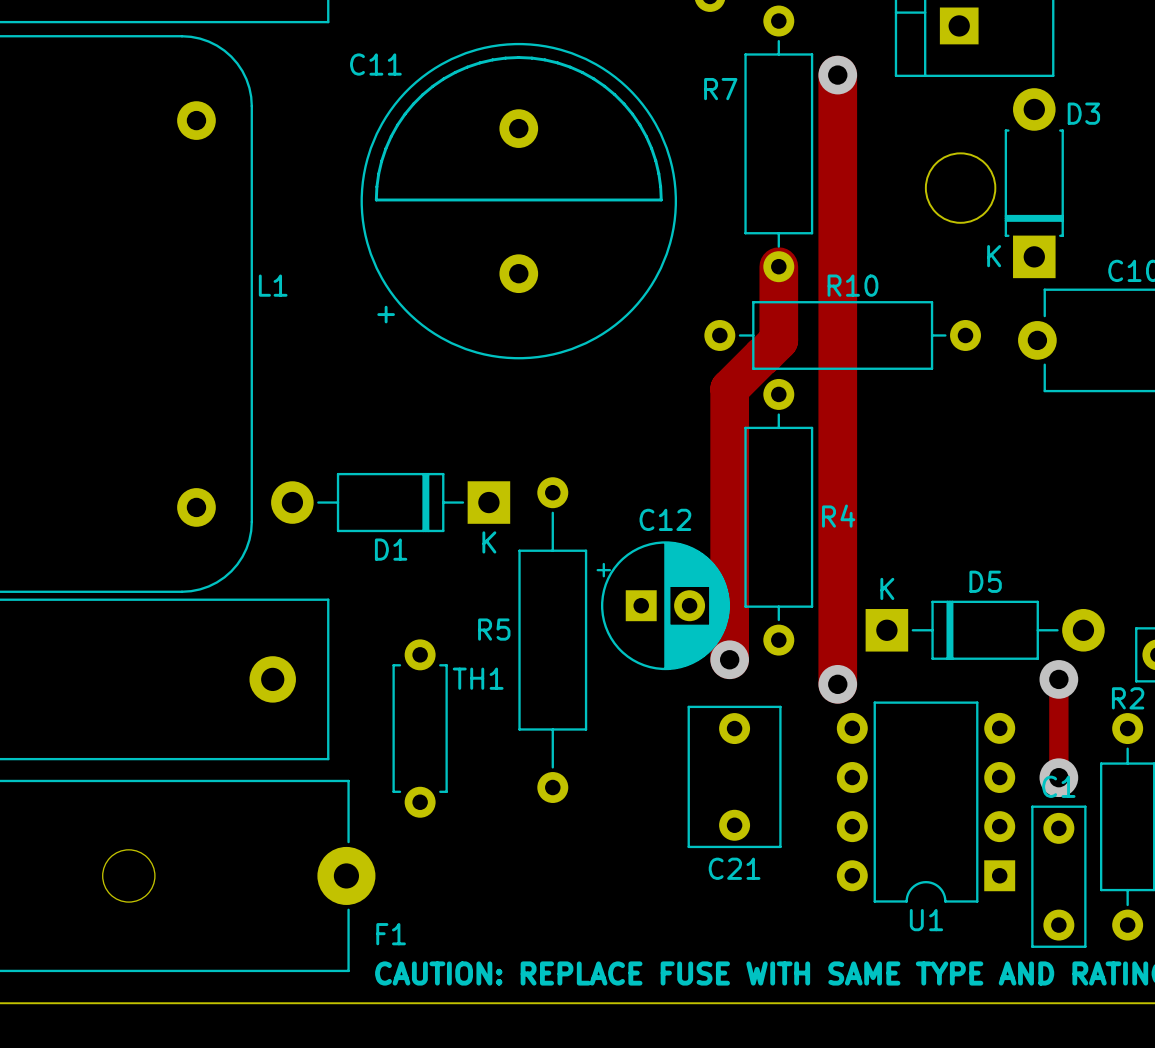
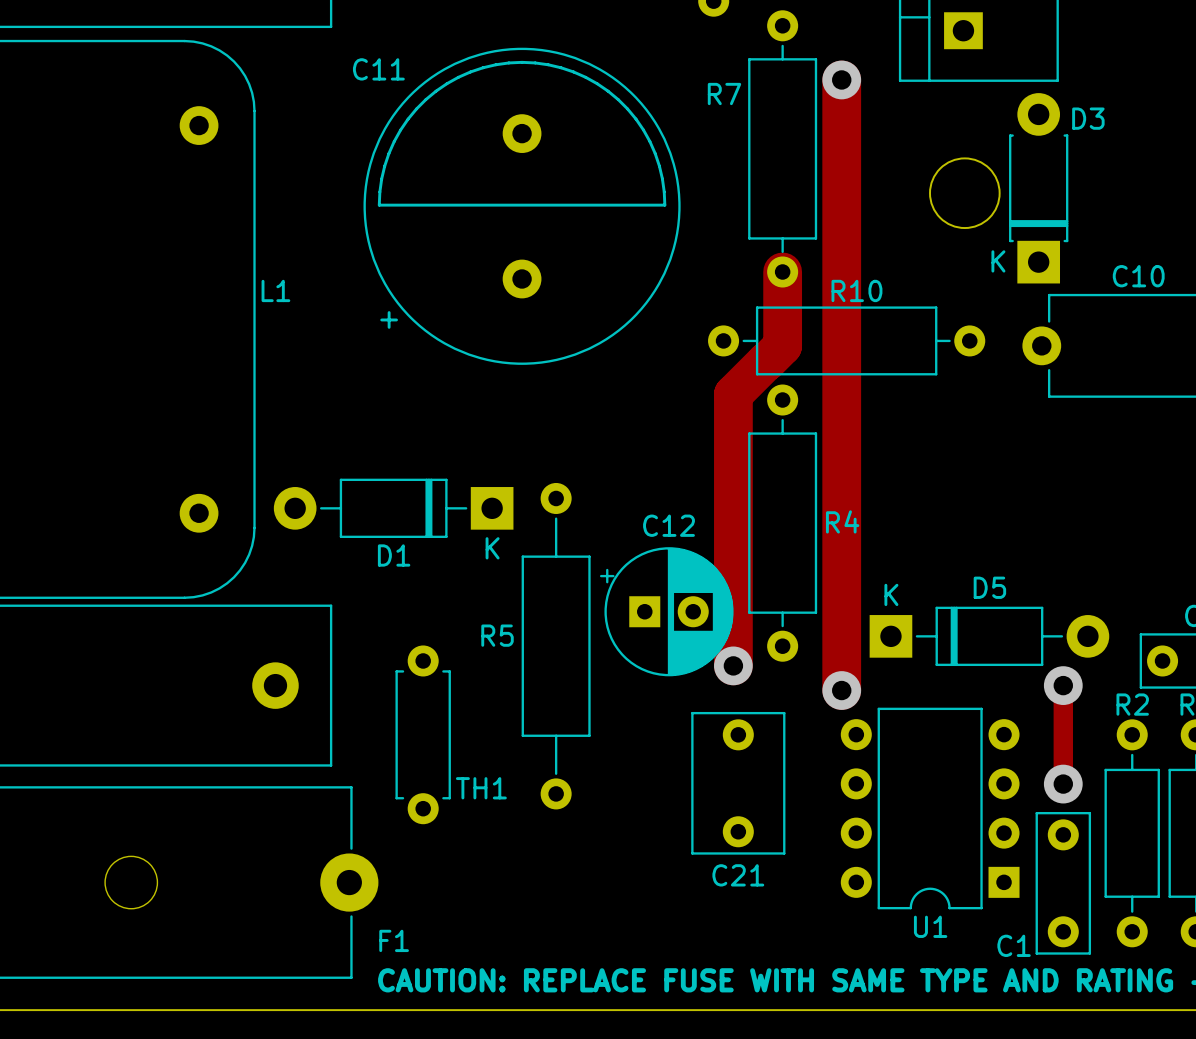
TH1 name position: TH1 (478, 678) -> TH1 (481, 788)
C1 name position: C1 (1058, 786) -> C1 (1014, 945)

